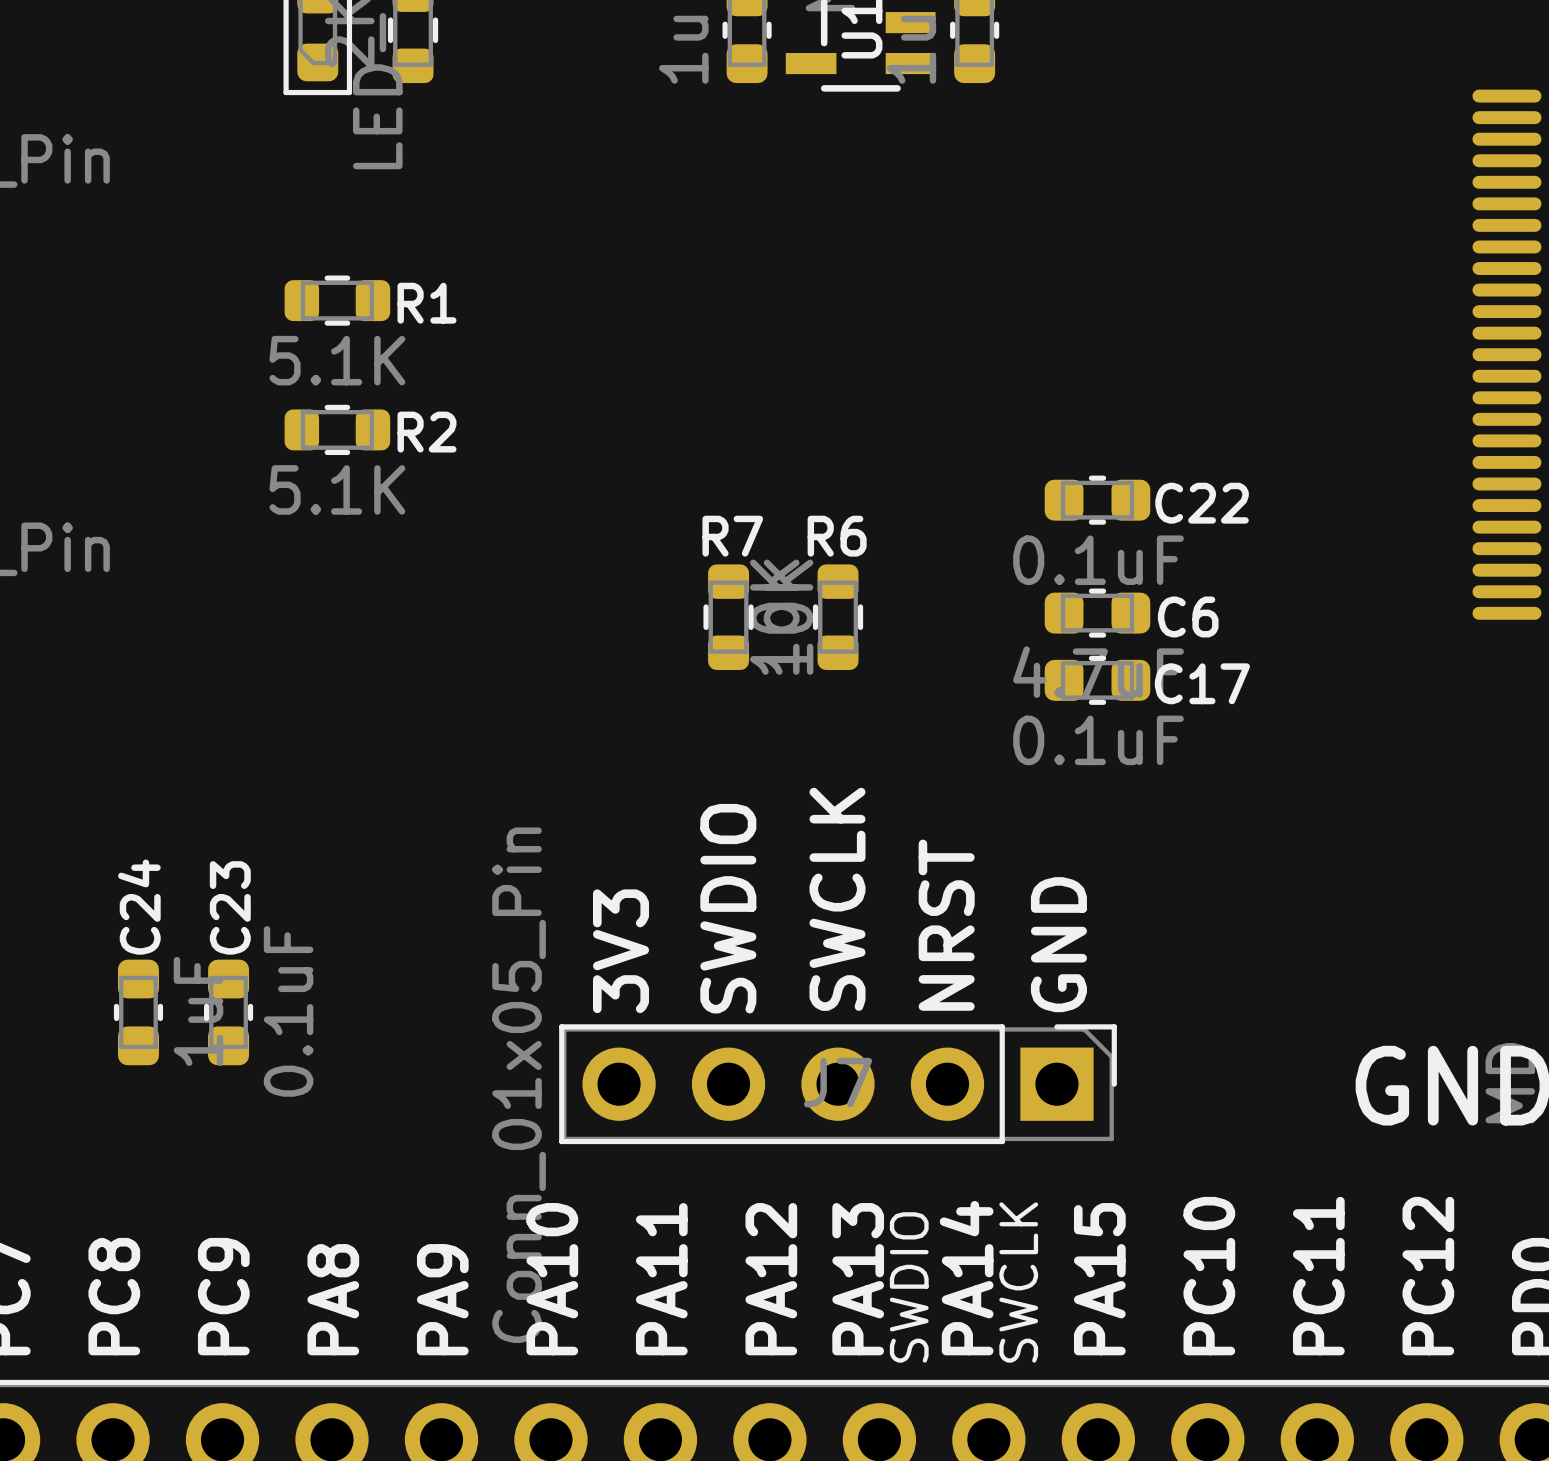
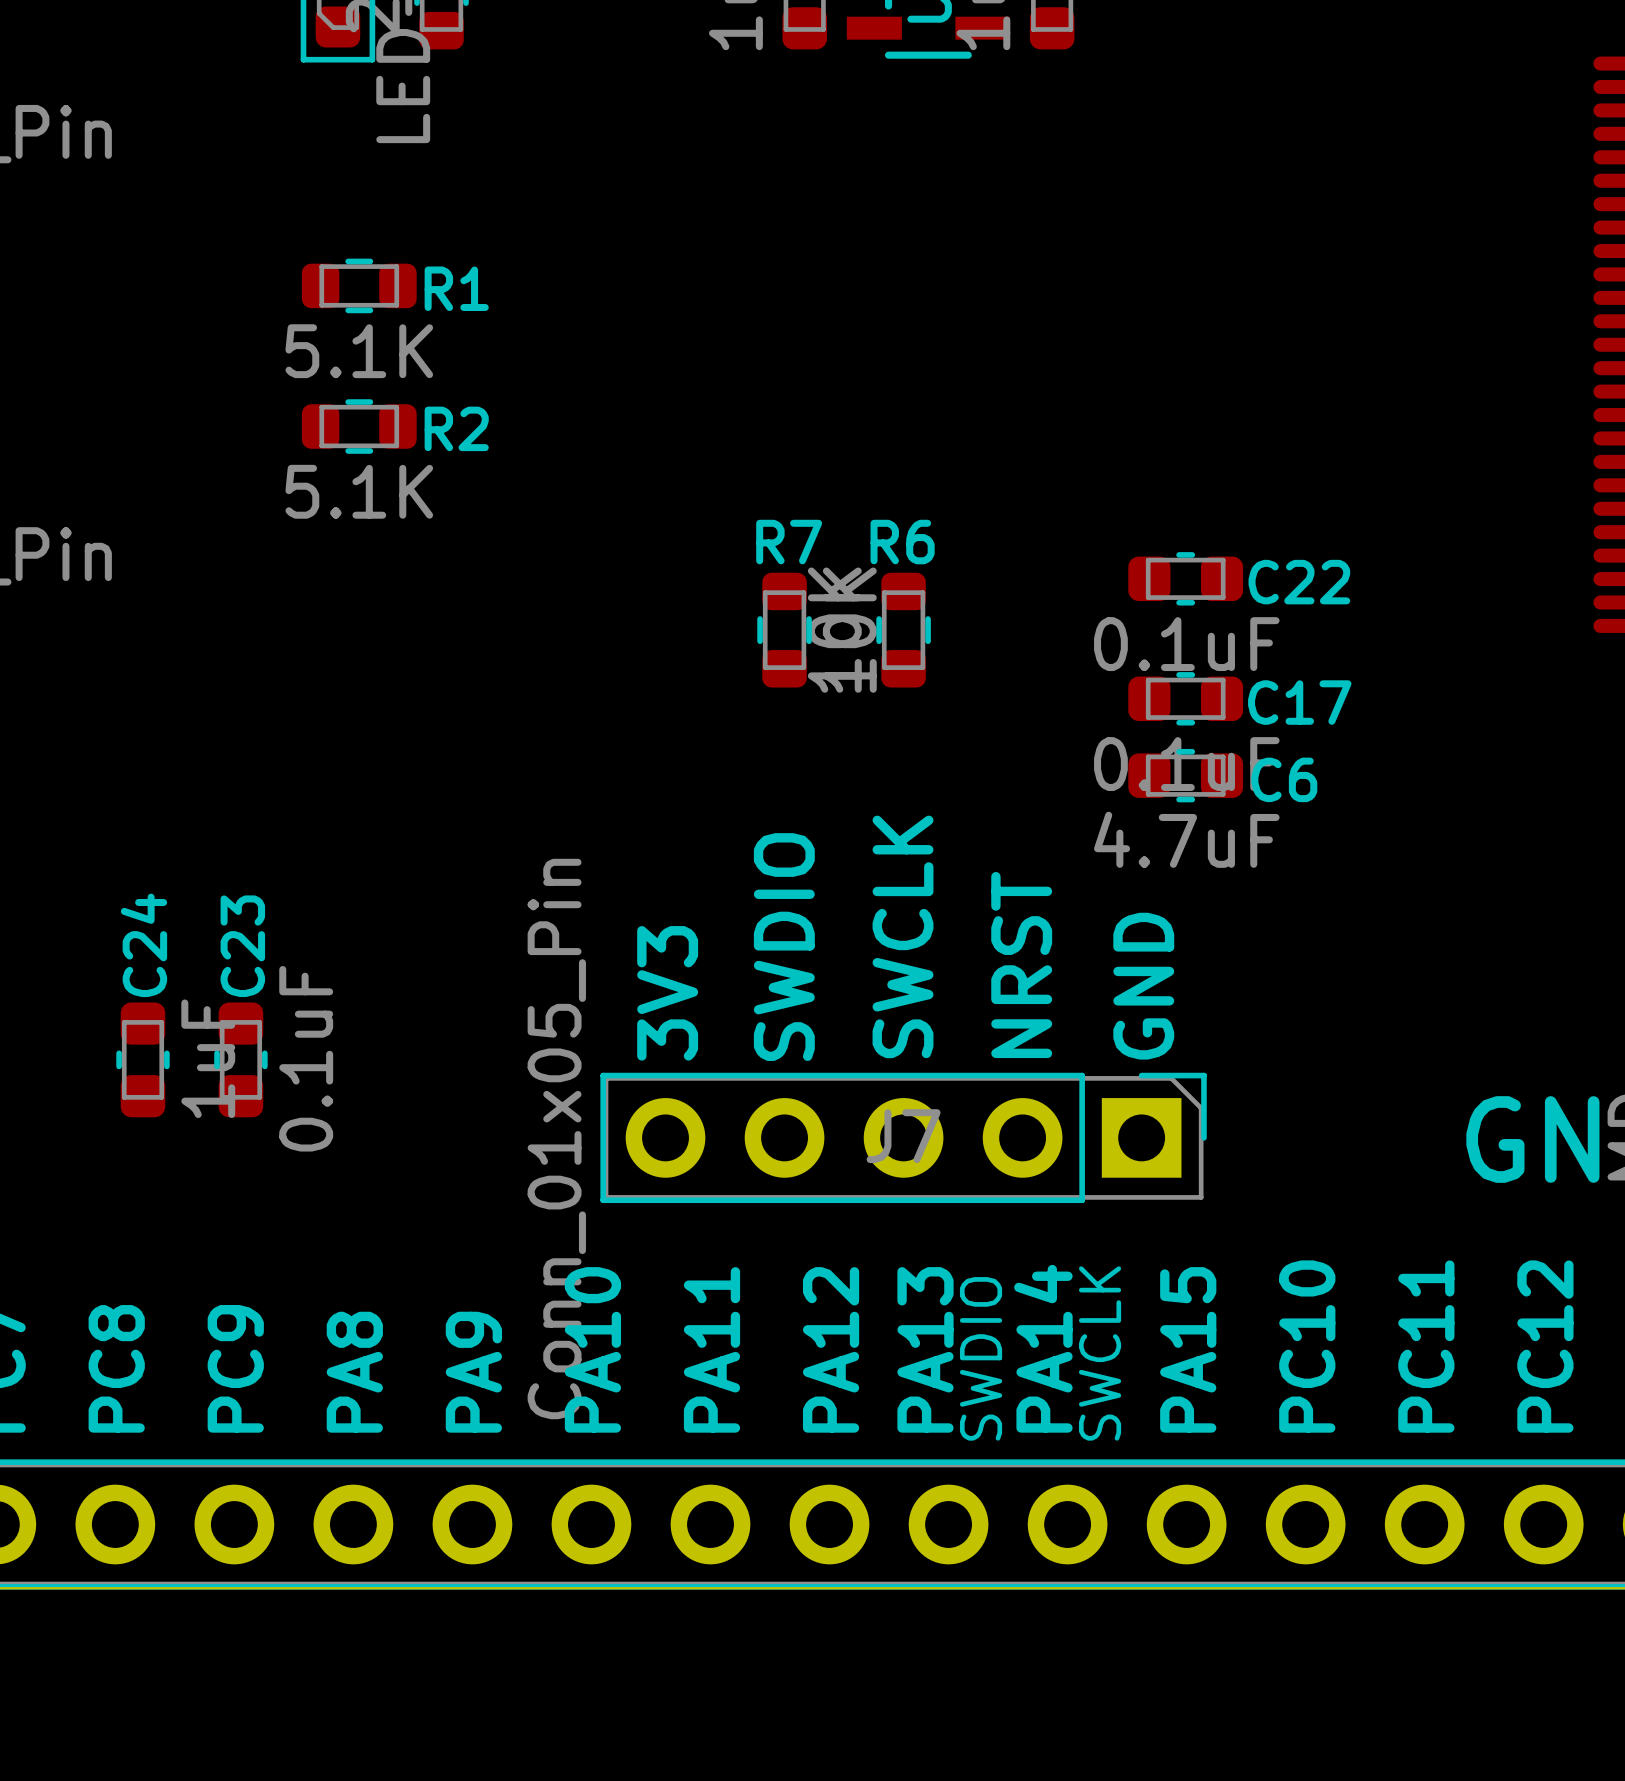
C22 position: (1097, 500) -> (1185, 578)
C6 position: (1097, 613) -> (1185, 775)

